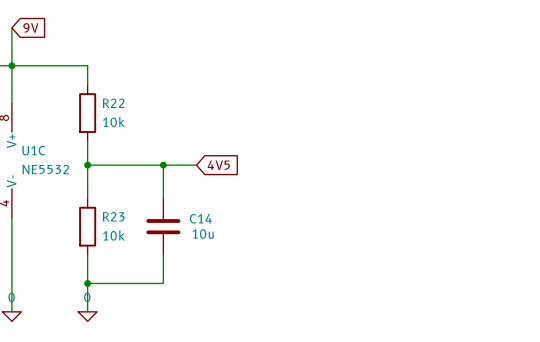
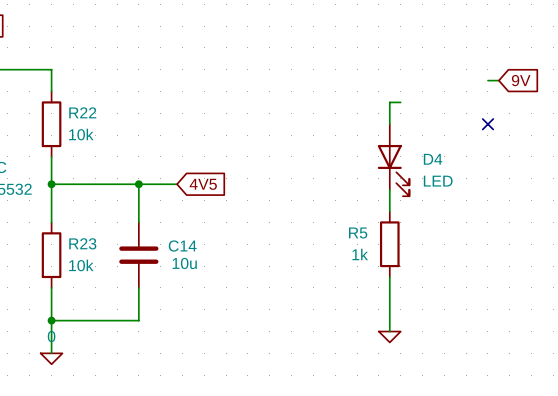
wire: none -> (487, 80) (498, 80)
global label: none -> 9V (521, 80)
wire: none -> (400, 102) (389, 102) (389, 124)
no-connect mark: none -> (487, 124)
D4: none -> LED (393, 160)
wire: none -> (389, 189) (389, 211)
R5: none -> 1k (389, 244)
wire: none -> (389, 276) (389, 331)
power symbol: none -> (389, 336)

